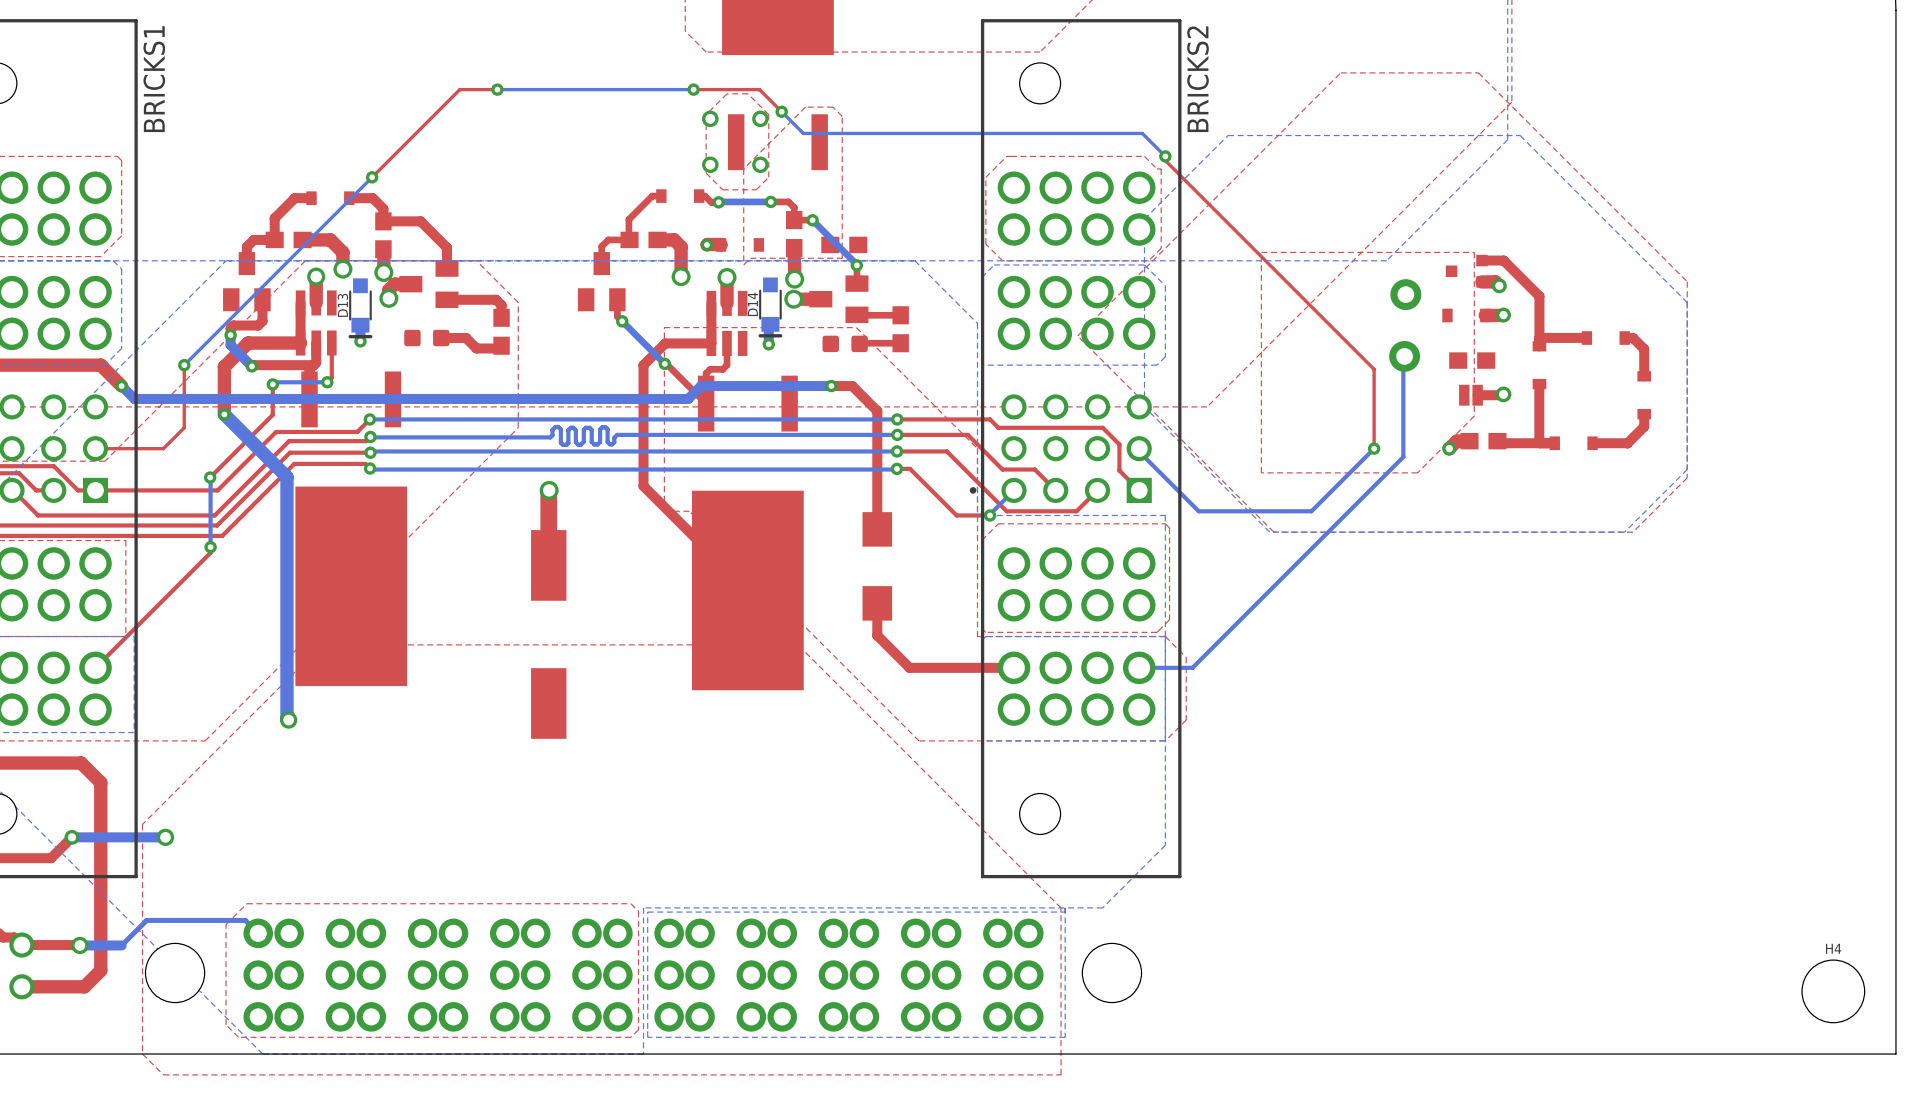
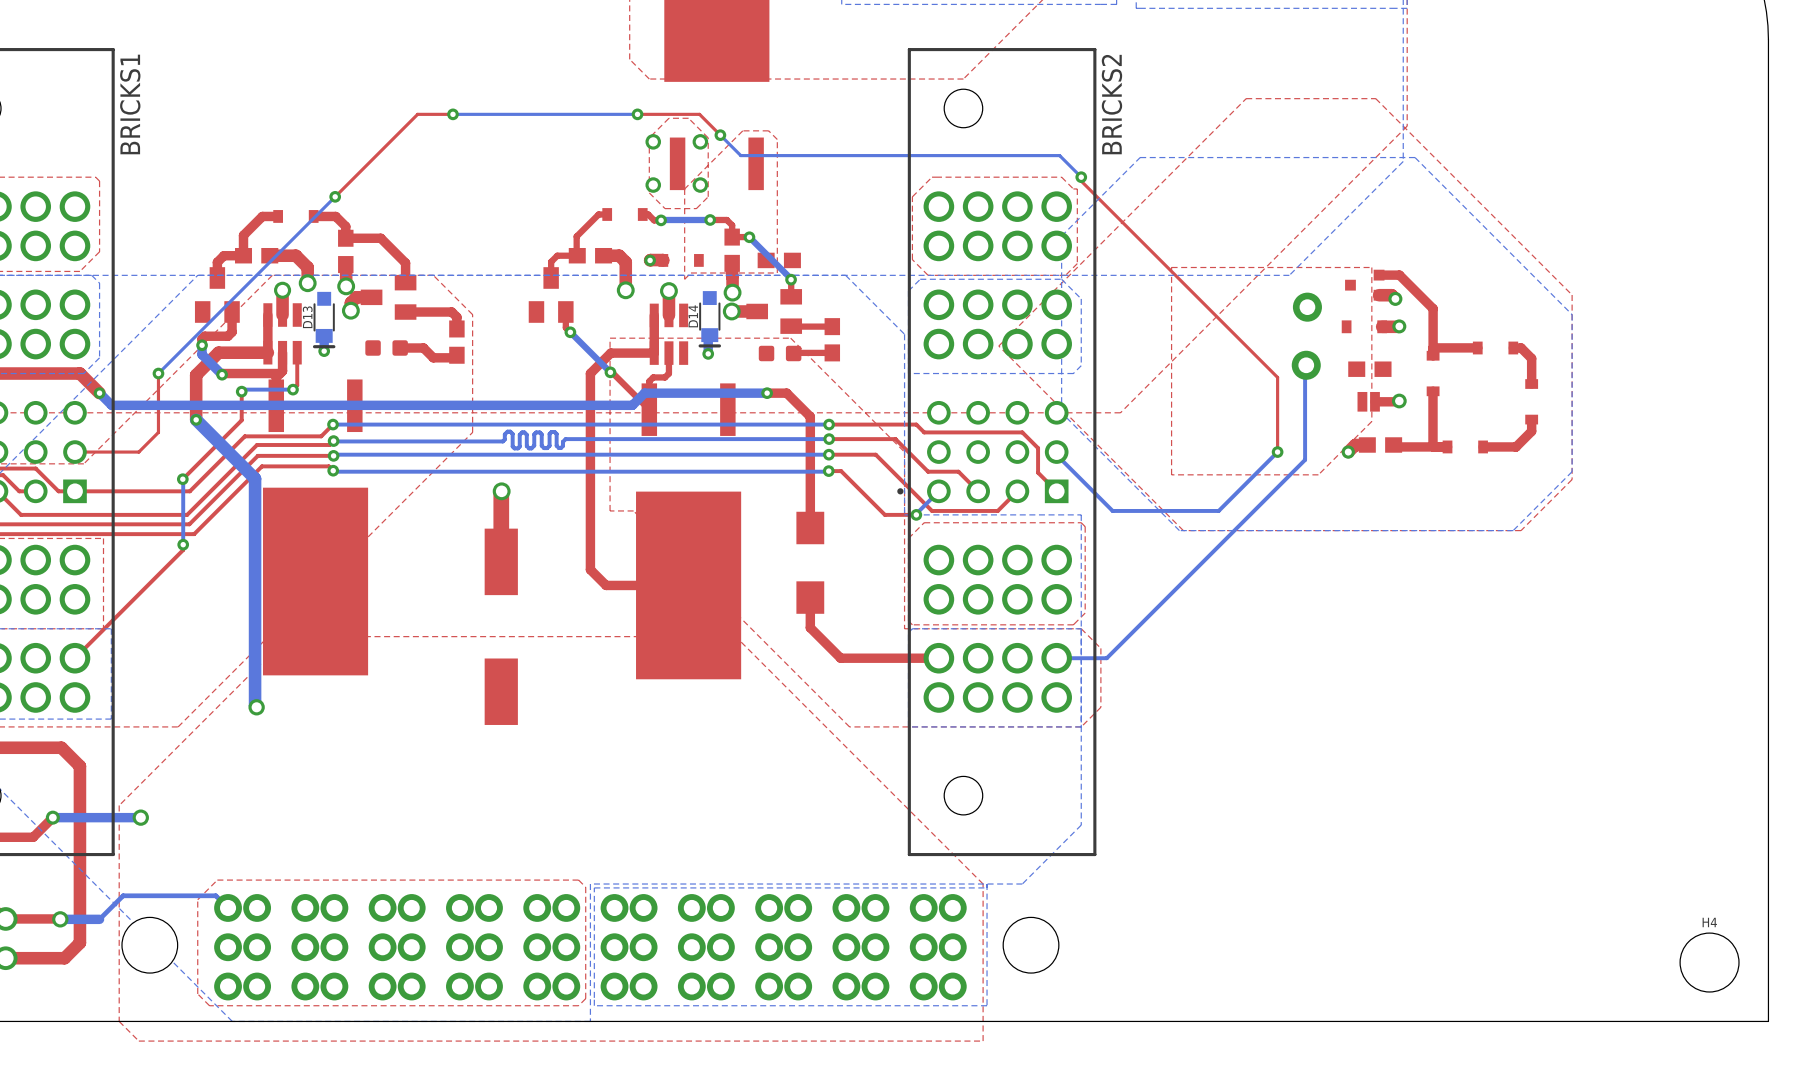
top track: (643, 486) (747, 590) -> (590, 487) (590, 569) (606, 585) (688, 585)

